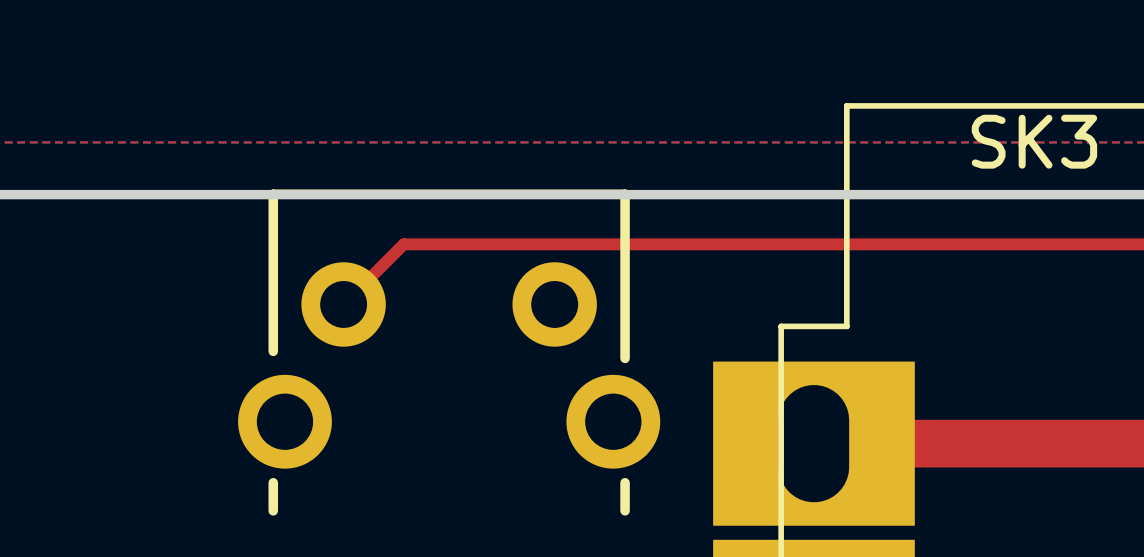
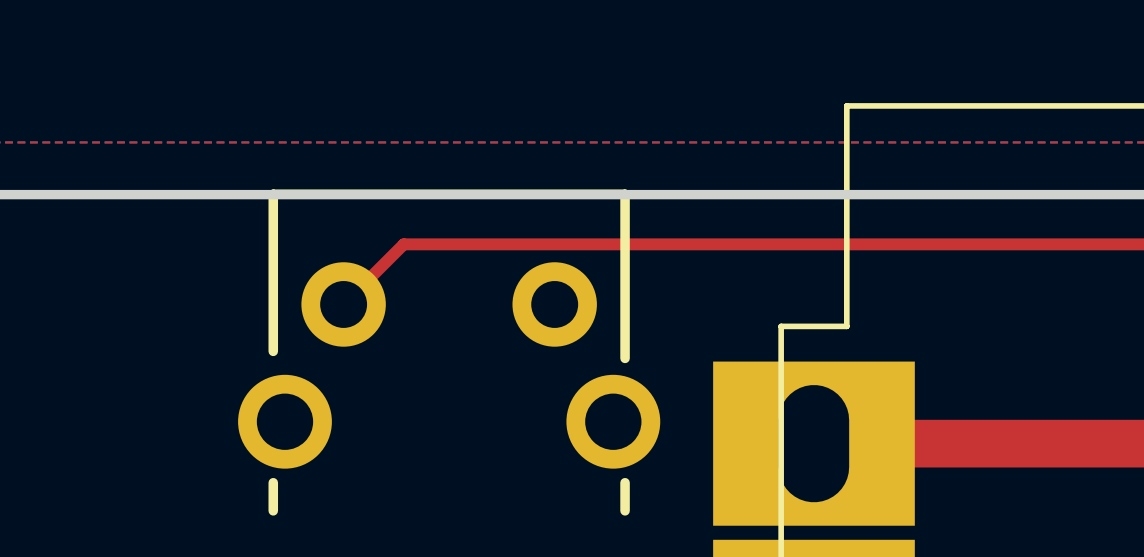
SK3 name: SK3 (1034, 141) -> none

